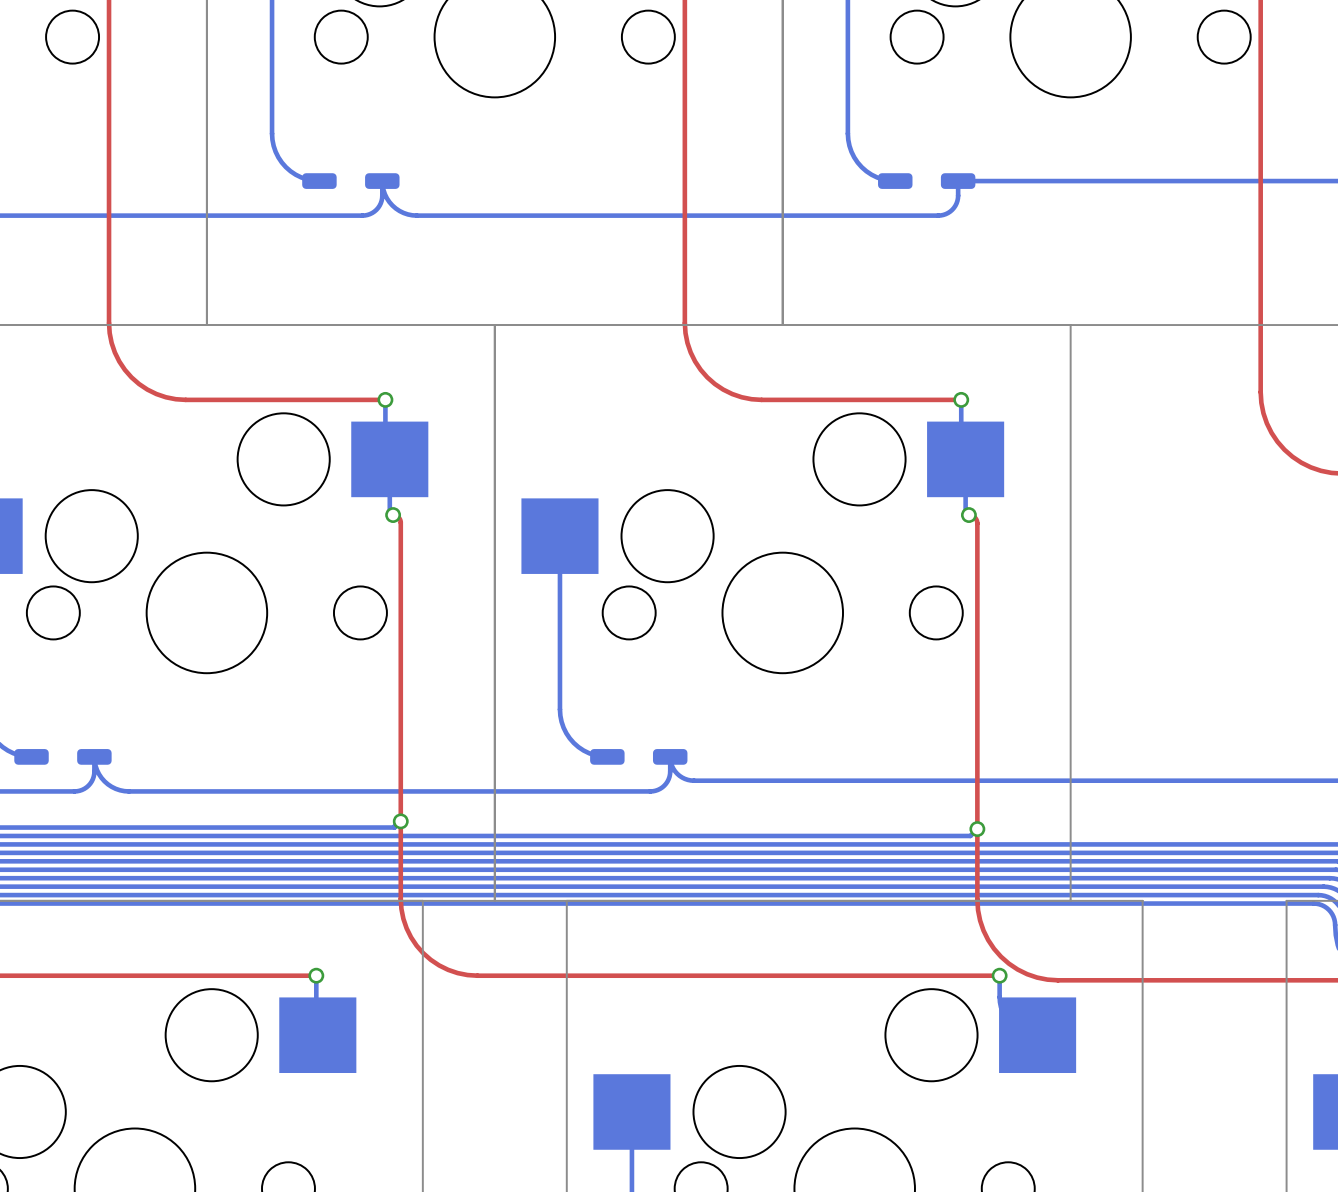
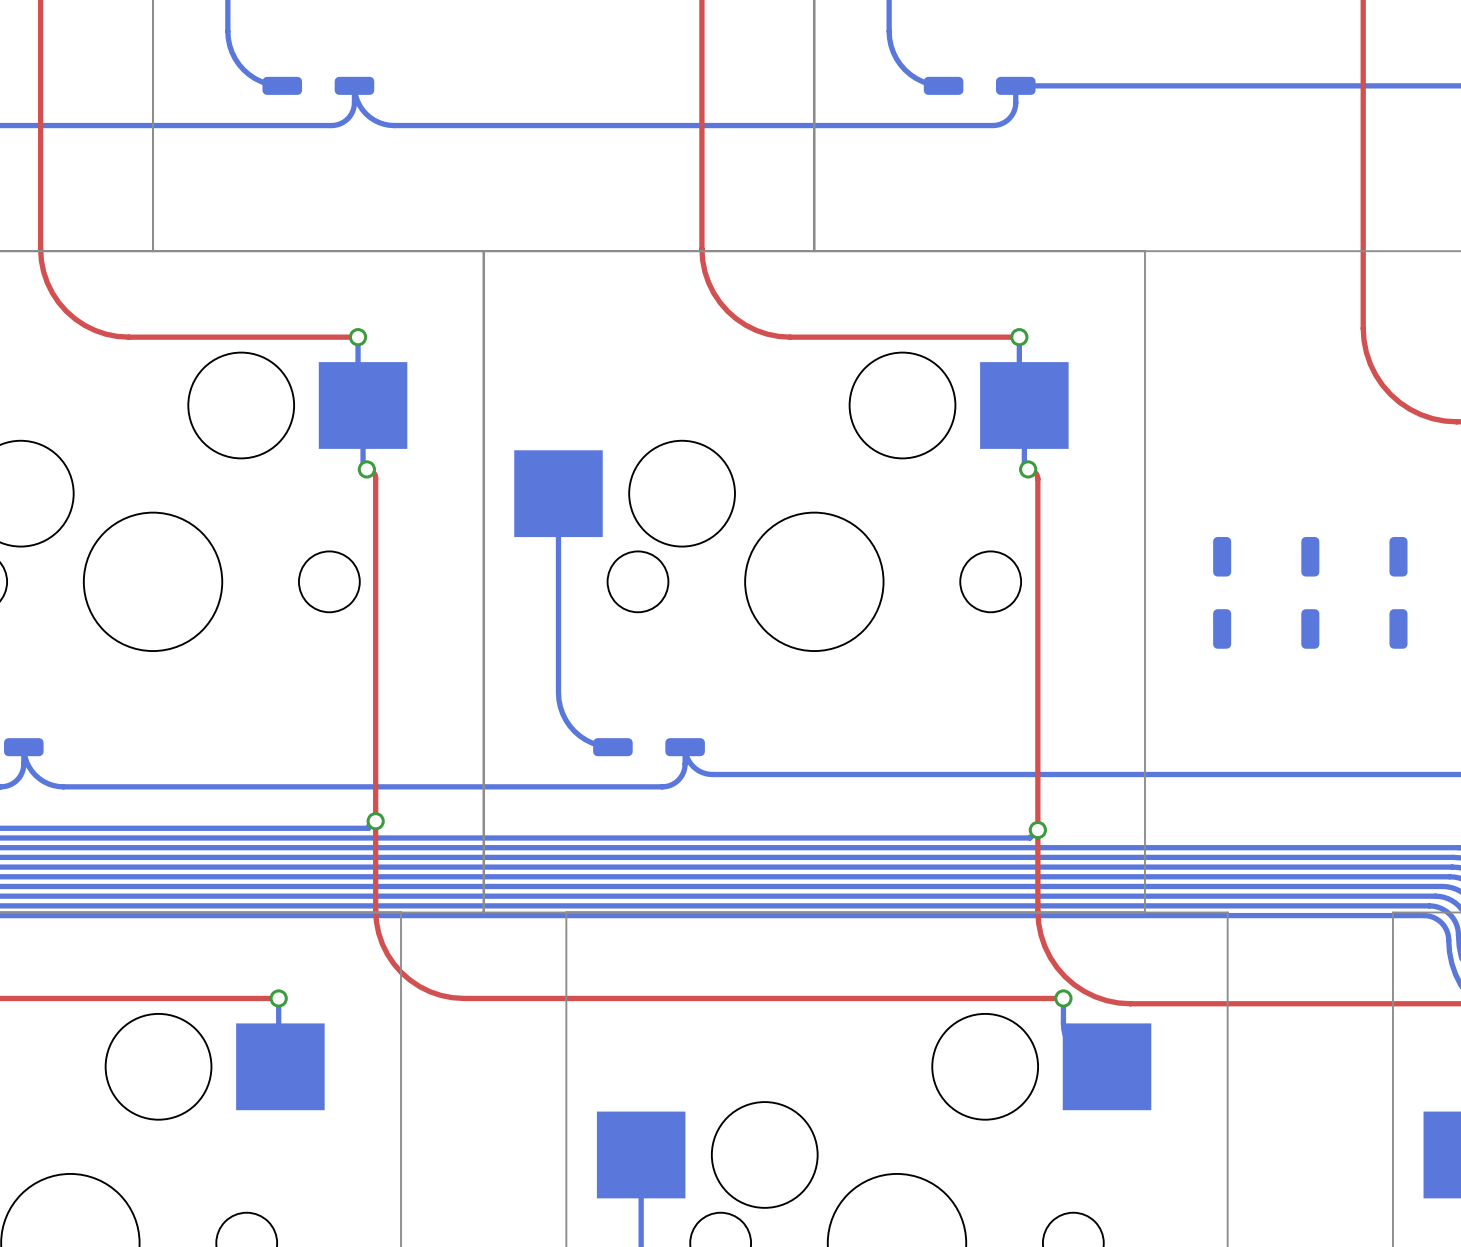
part: none -> (1222, 592)
part: none -> (1310, 592)
part: none -> (1398, 592)

